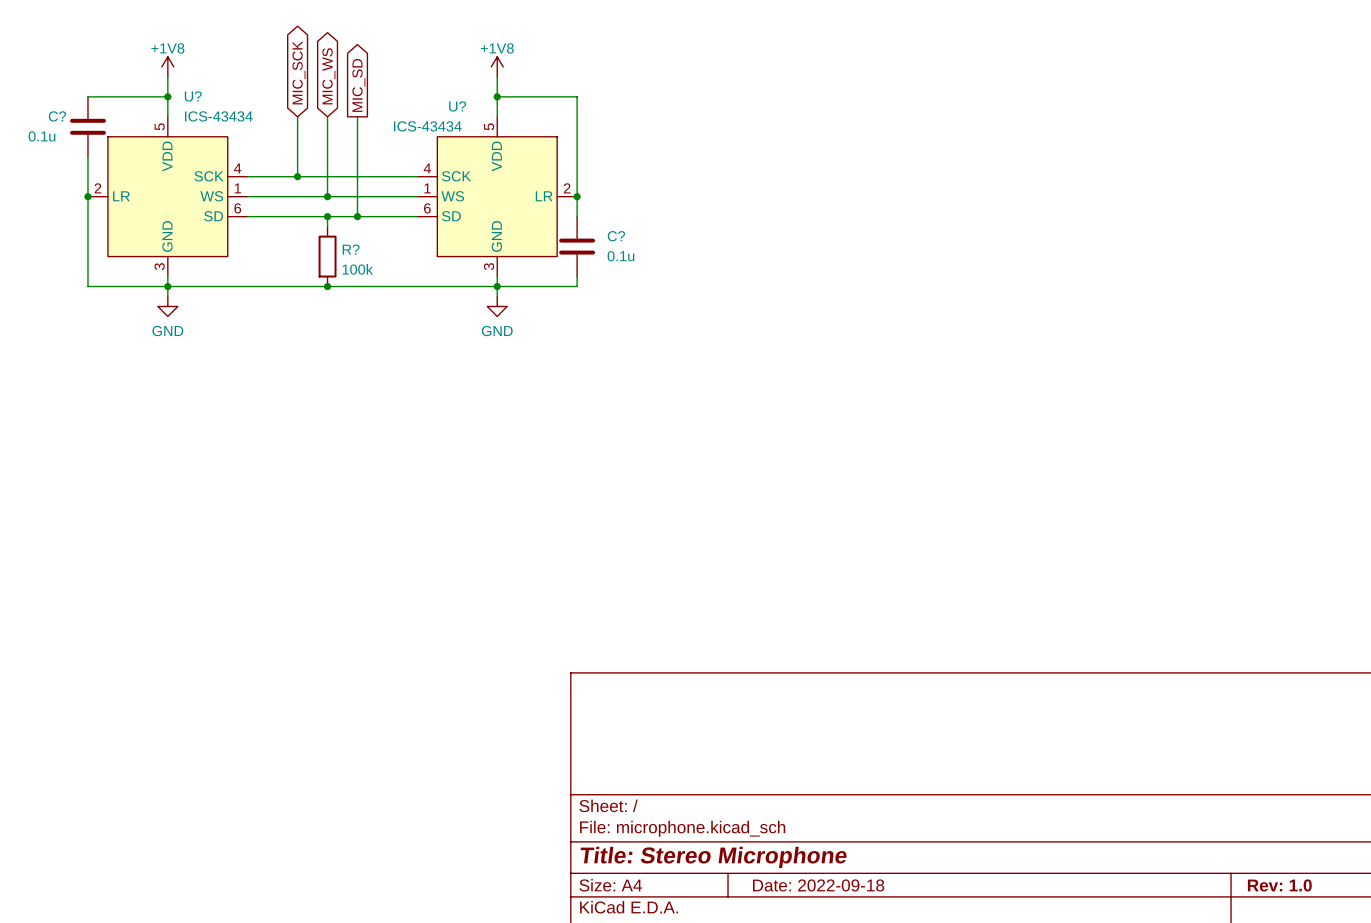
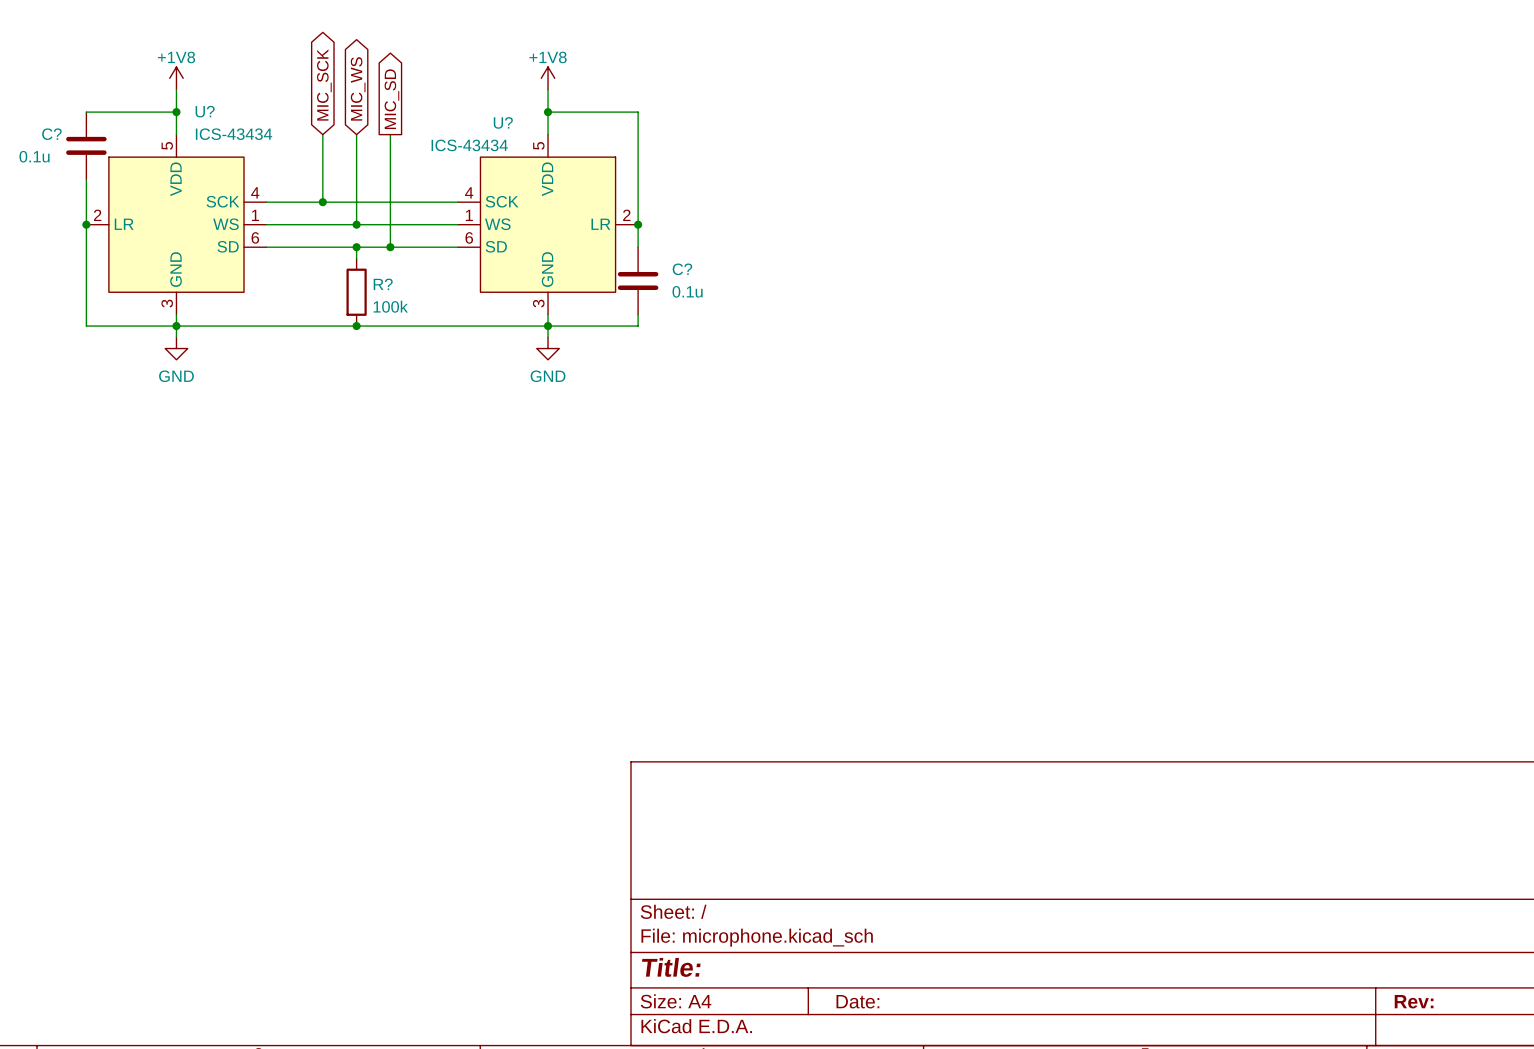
title block: Title: Stereo Microphone (713, 857) -> Title: (671, 967)
title block: Date: 2022-09-18 (818, 885) -> Date: (857, 1001)
title block: Rev: 1.0 (1279, 885) -> Rev: (1414, 1001)

